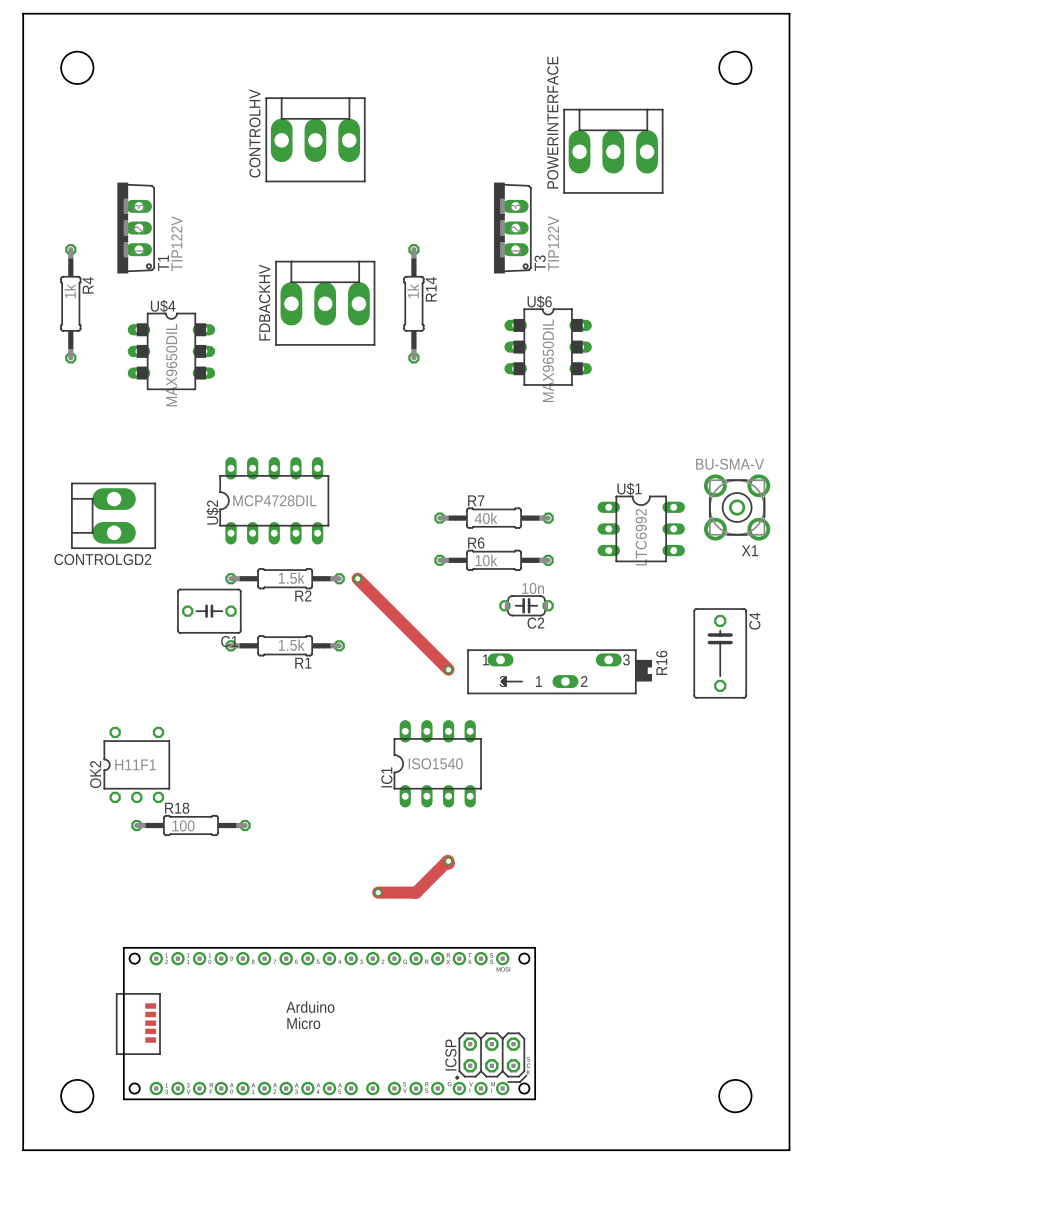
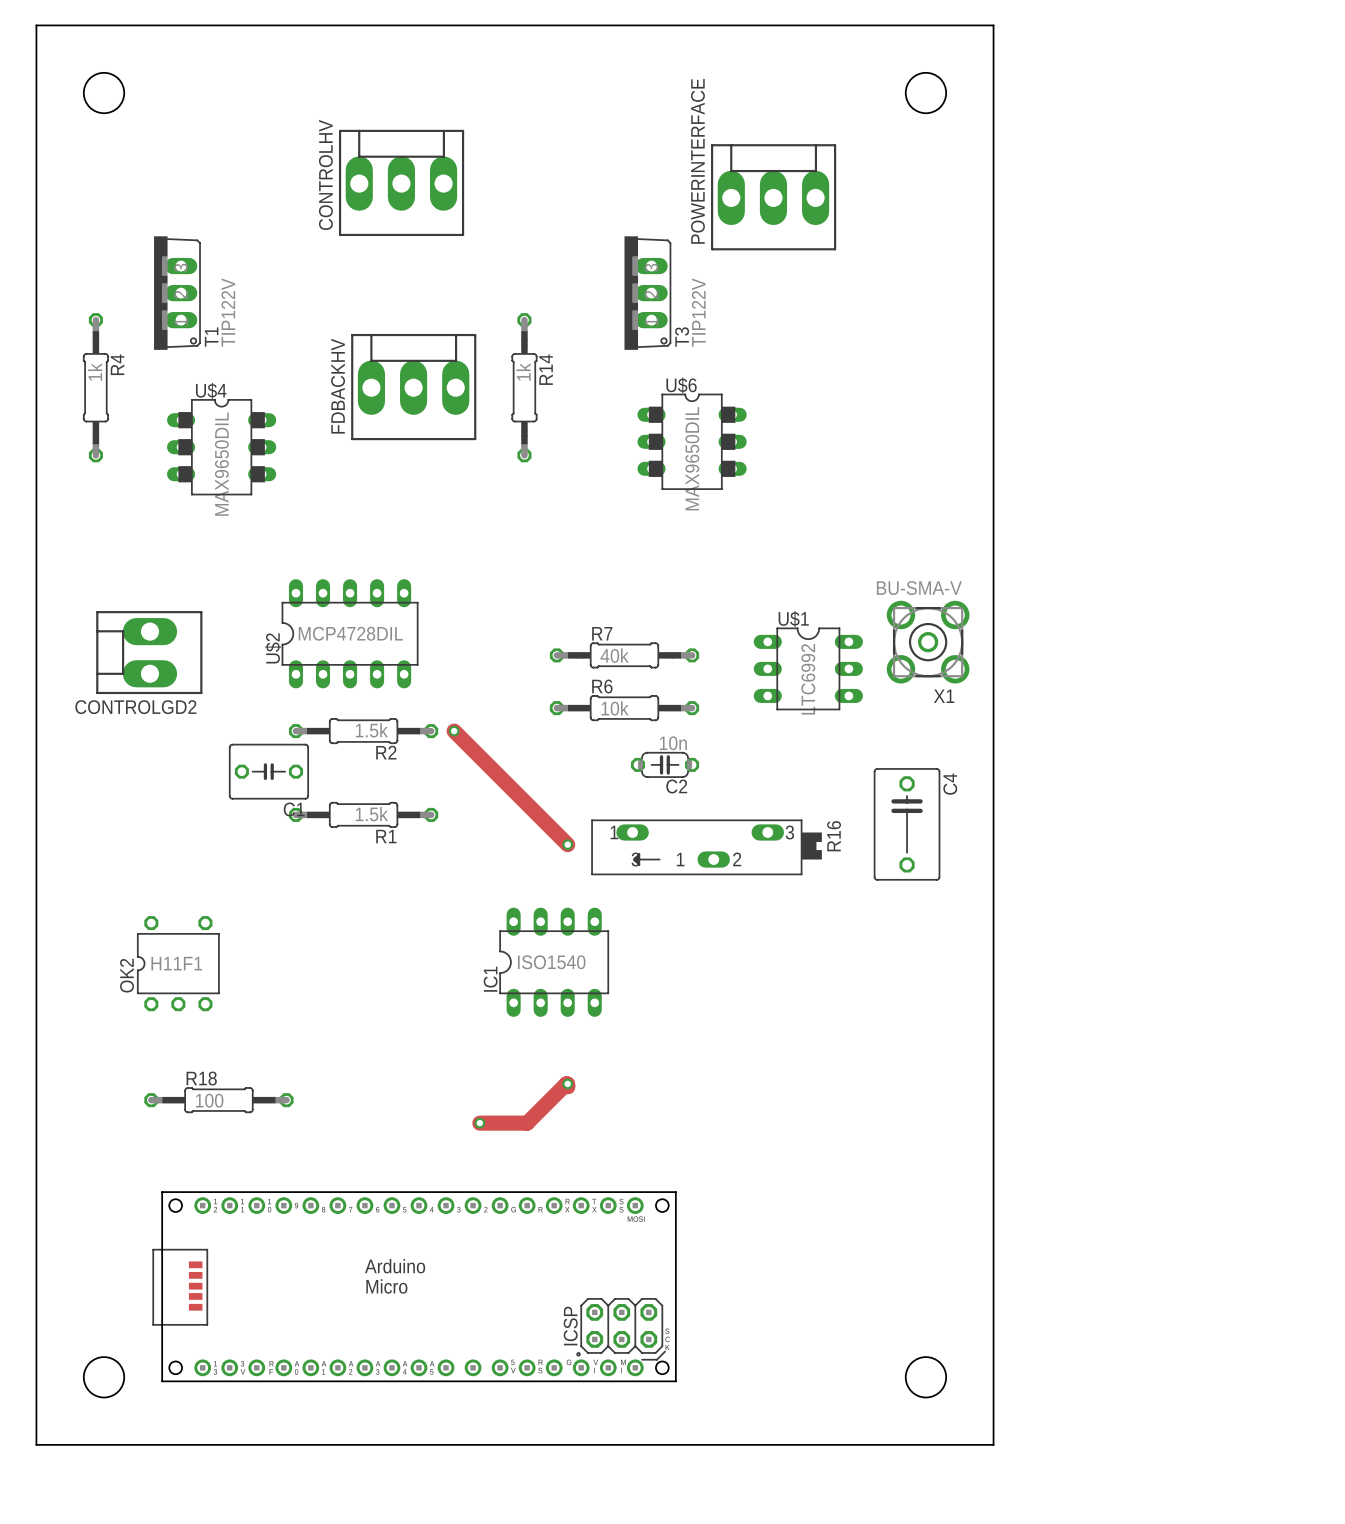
R18 position: (190, 825) -> (218, 1100)

